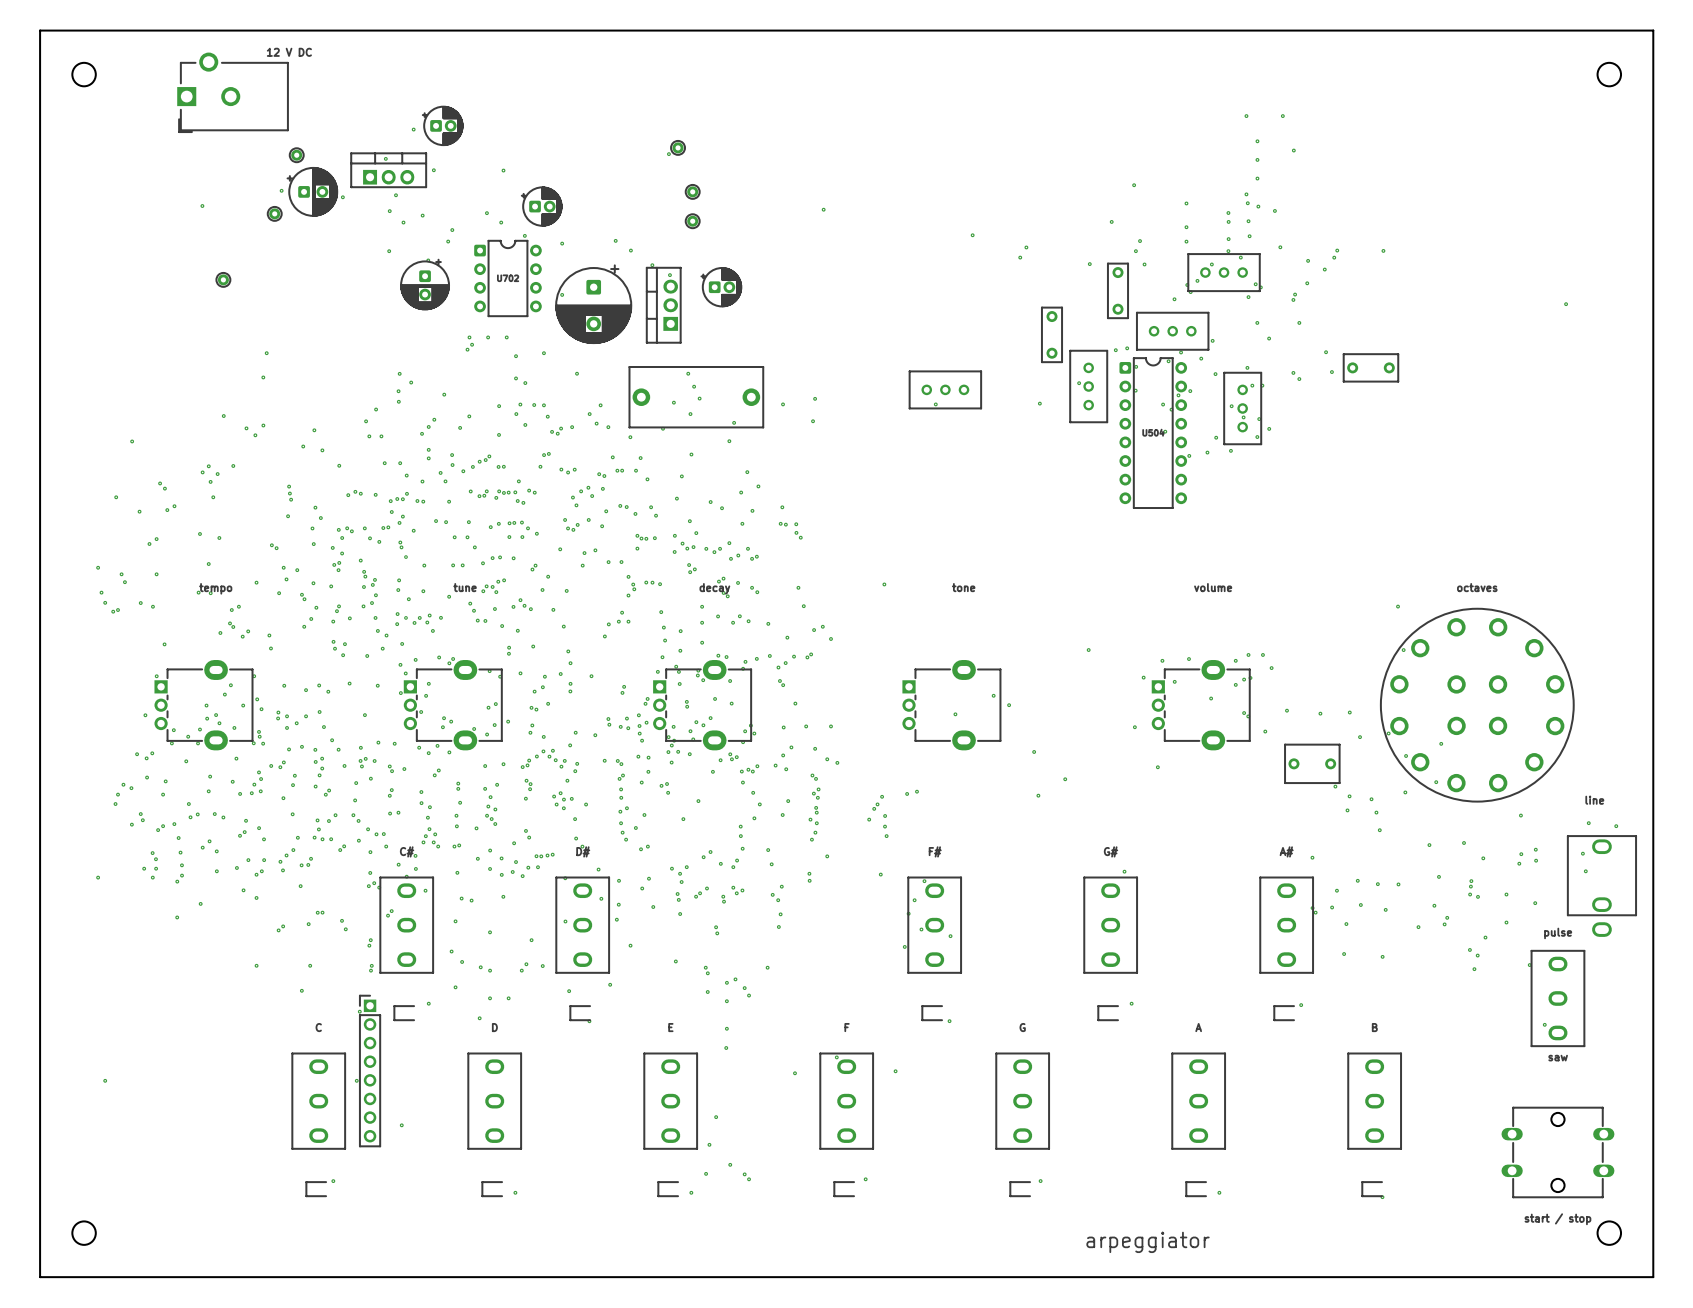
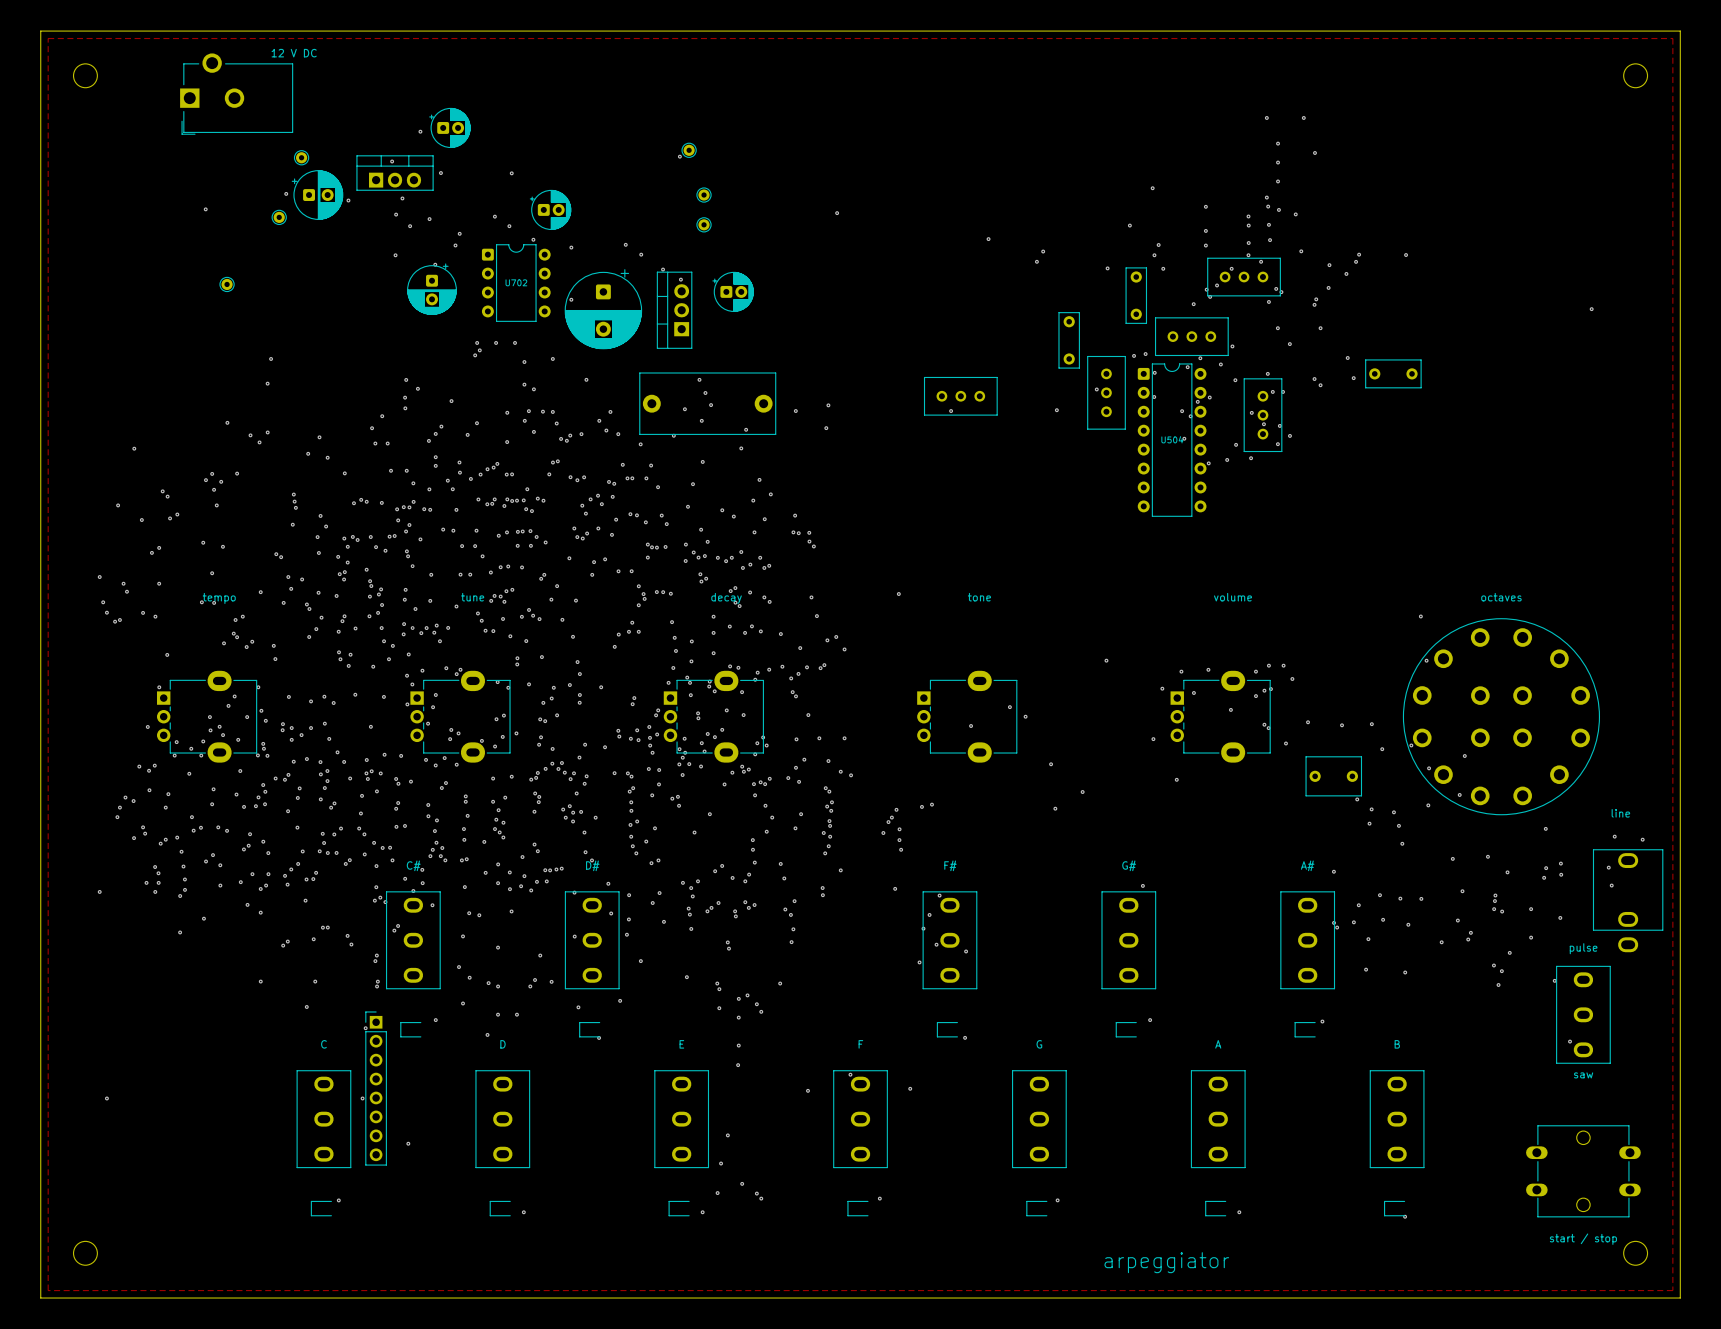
zone outline: none -> (48, 38) (1672, 38) (1672, 1290) (48, 1290) (48, 38)

